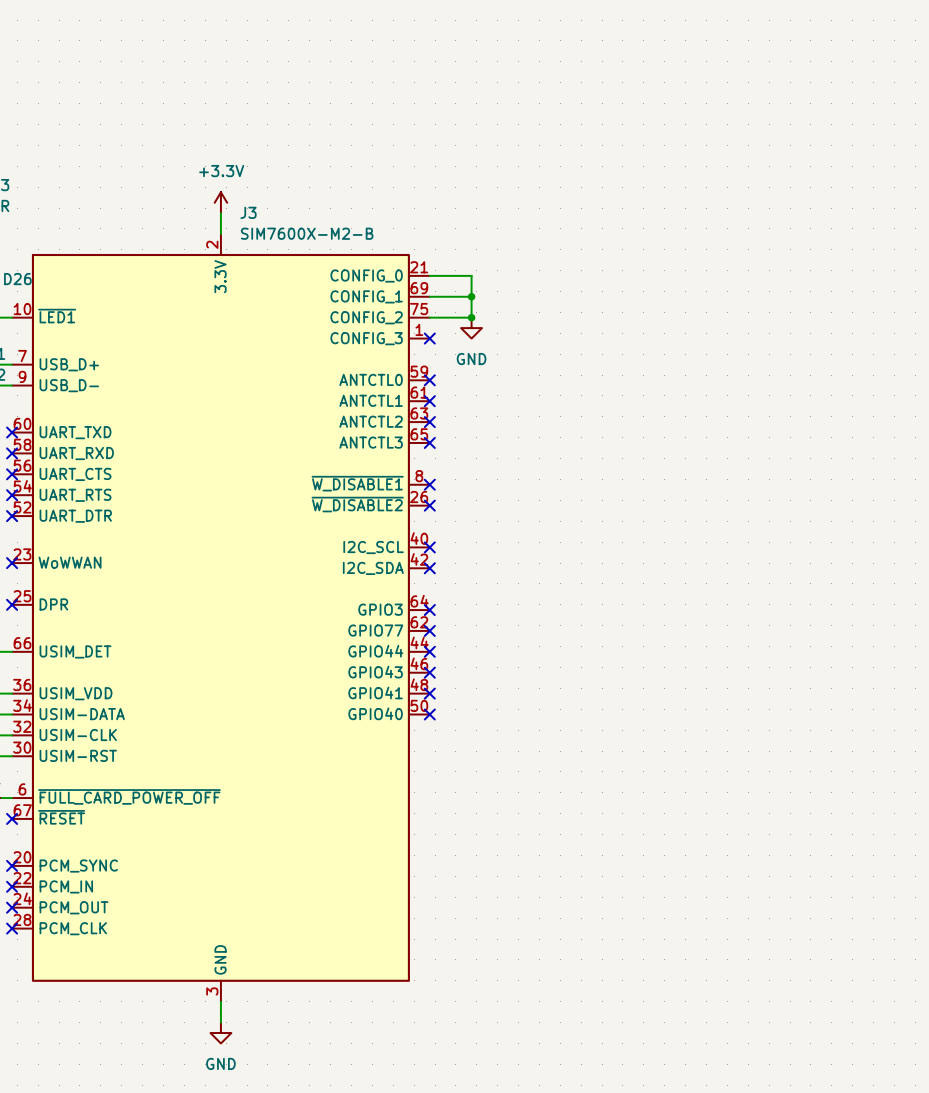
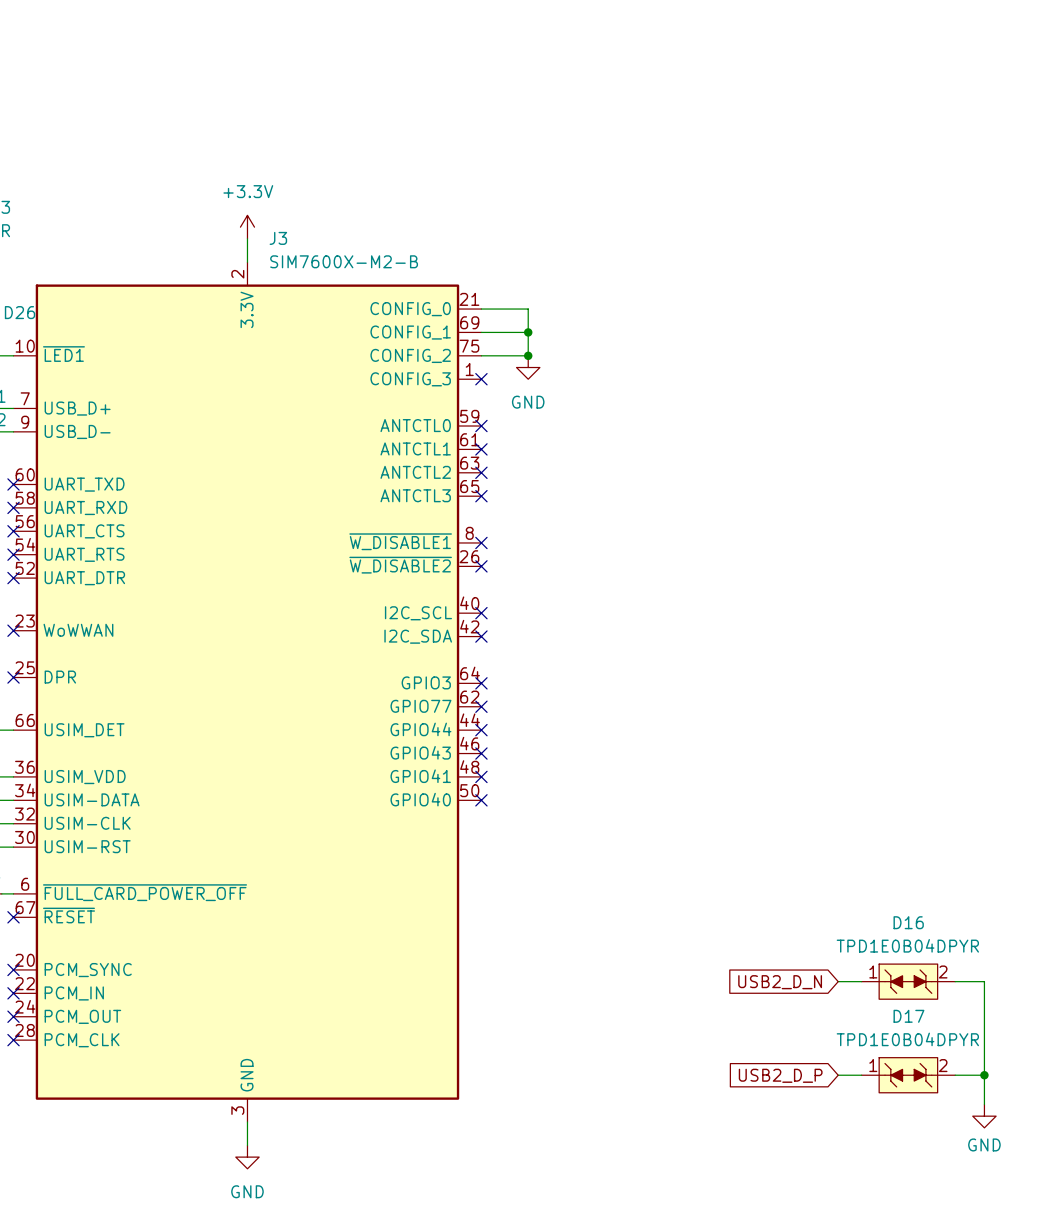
global label: none -> USB2_D_N (780, 982)
wire: none -> (838, 981) (861, 981)
D16: none -> TPD1E0B04DPYR (908, 981)
wire: none -> (955, 981) (984, 981) (984, 1104)
wire: none -> (838, 1075) (861, 1075)
D17: none -> TPD1E0B04DPYR (908, 1075)
wire: none -> (955, 1075) (984, 1075)
junction: none -> (984, 1075)
global label: none -> USB2_D_P (780, 1075)
power symbol: none -> GND (984, 1116)

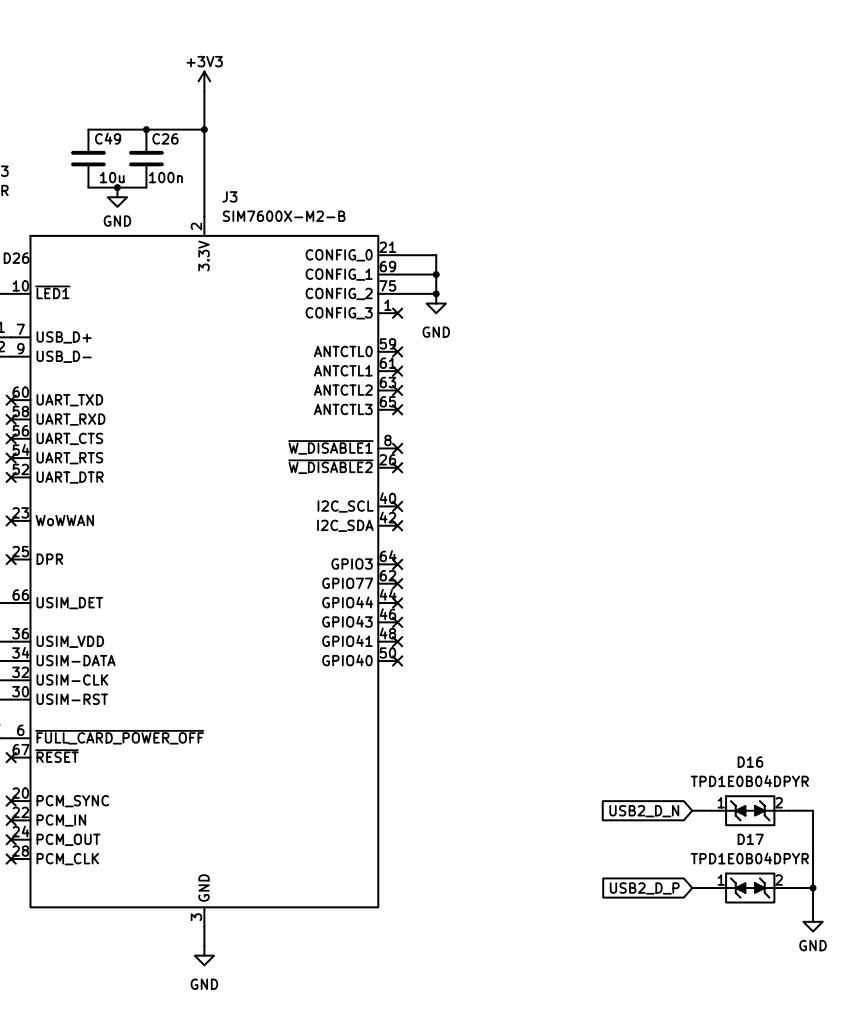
power symbol: none -> +3V3 (204, 81)
wire: none -> (204, 90) (204, 197)
wire: none -> (88, 129) (204, 129)
junction: none -> (146, 129)
junction: none -> (204, 129)
C49: none -> (88, 158)
C26: none -> (146, 158)
wire: none -> (88, 187) (146, 187)
junction: none -> (117, 187)
power symbol: +3.3V (247, 227) -> none
power symbol: none -> GND (117, 197)

